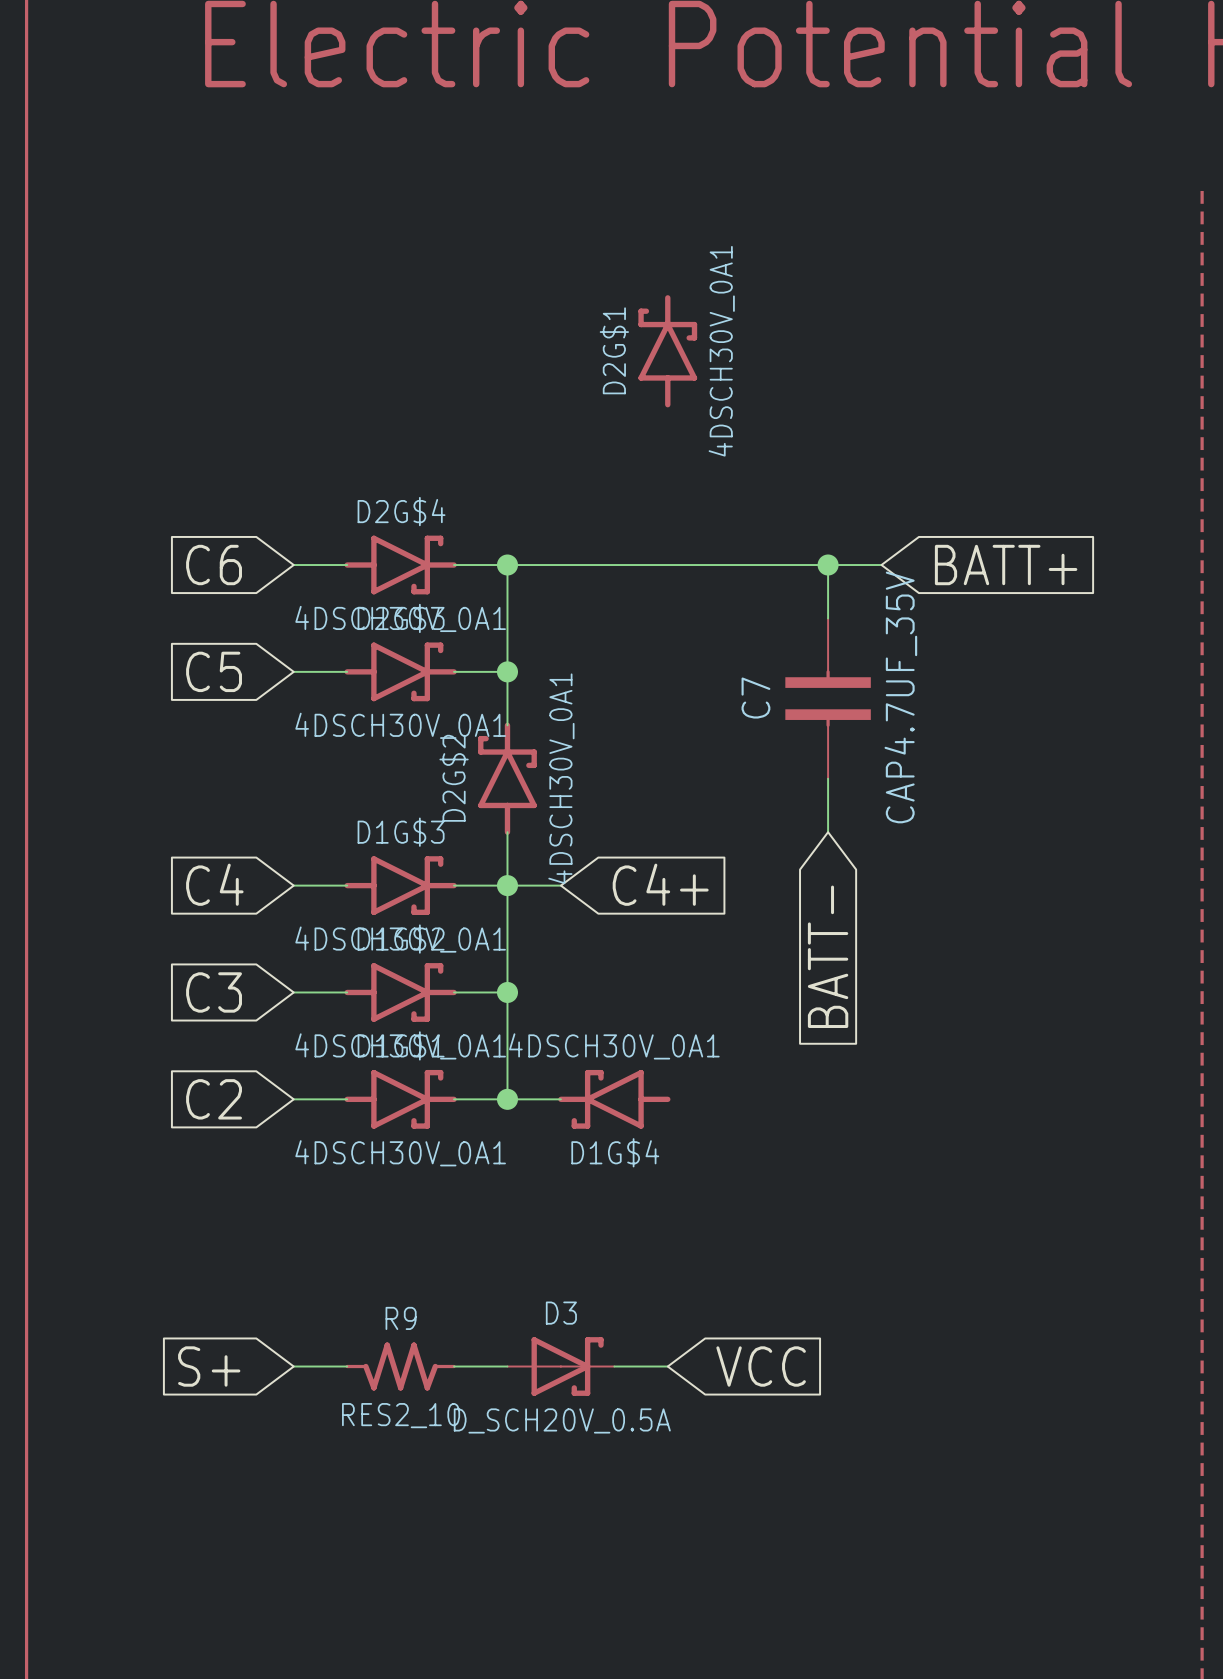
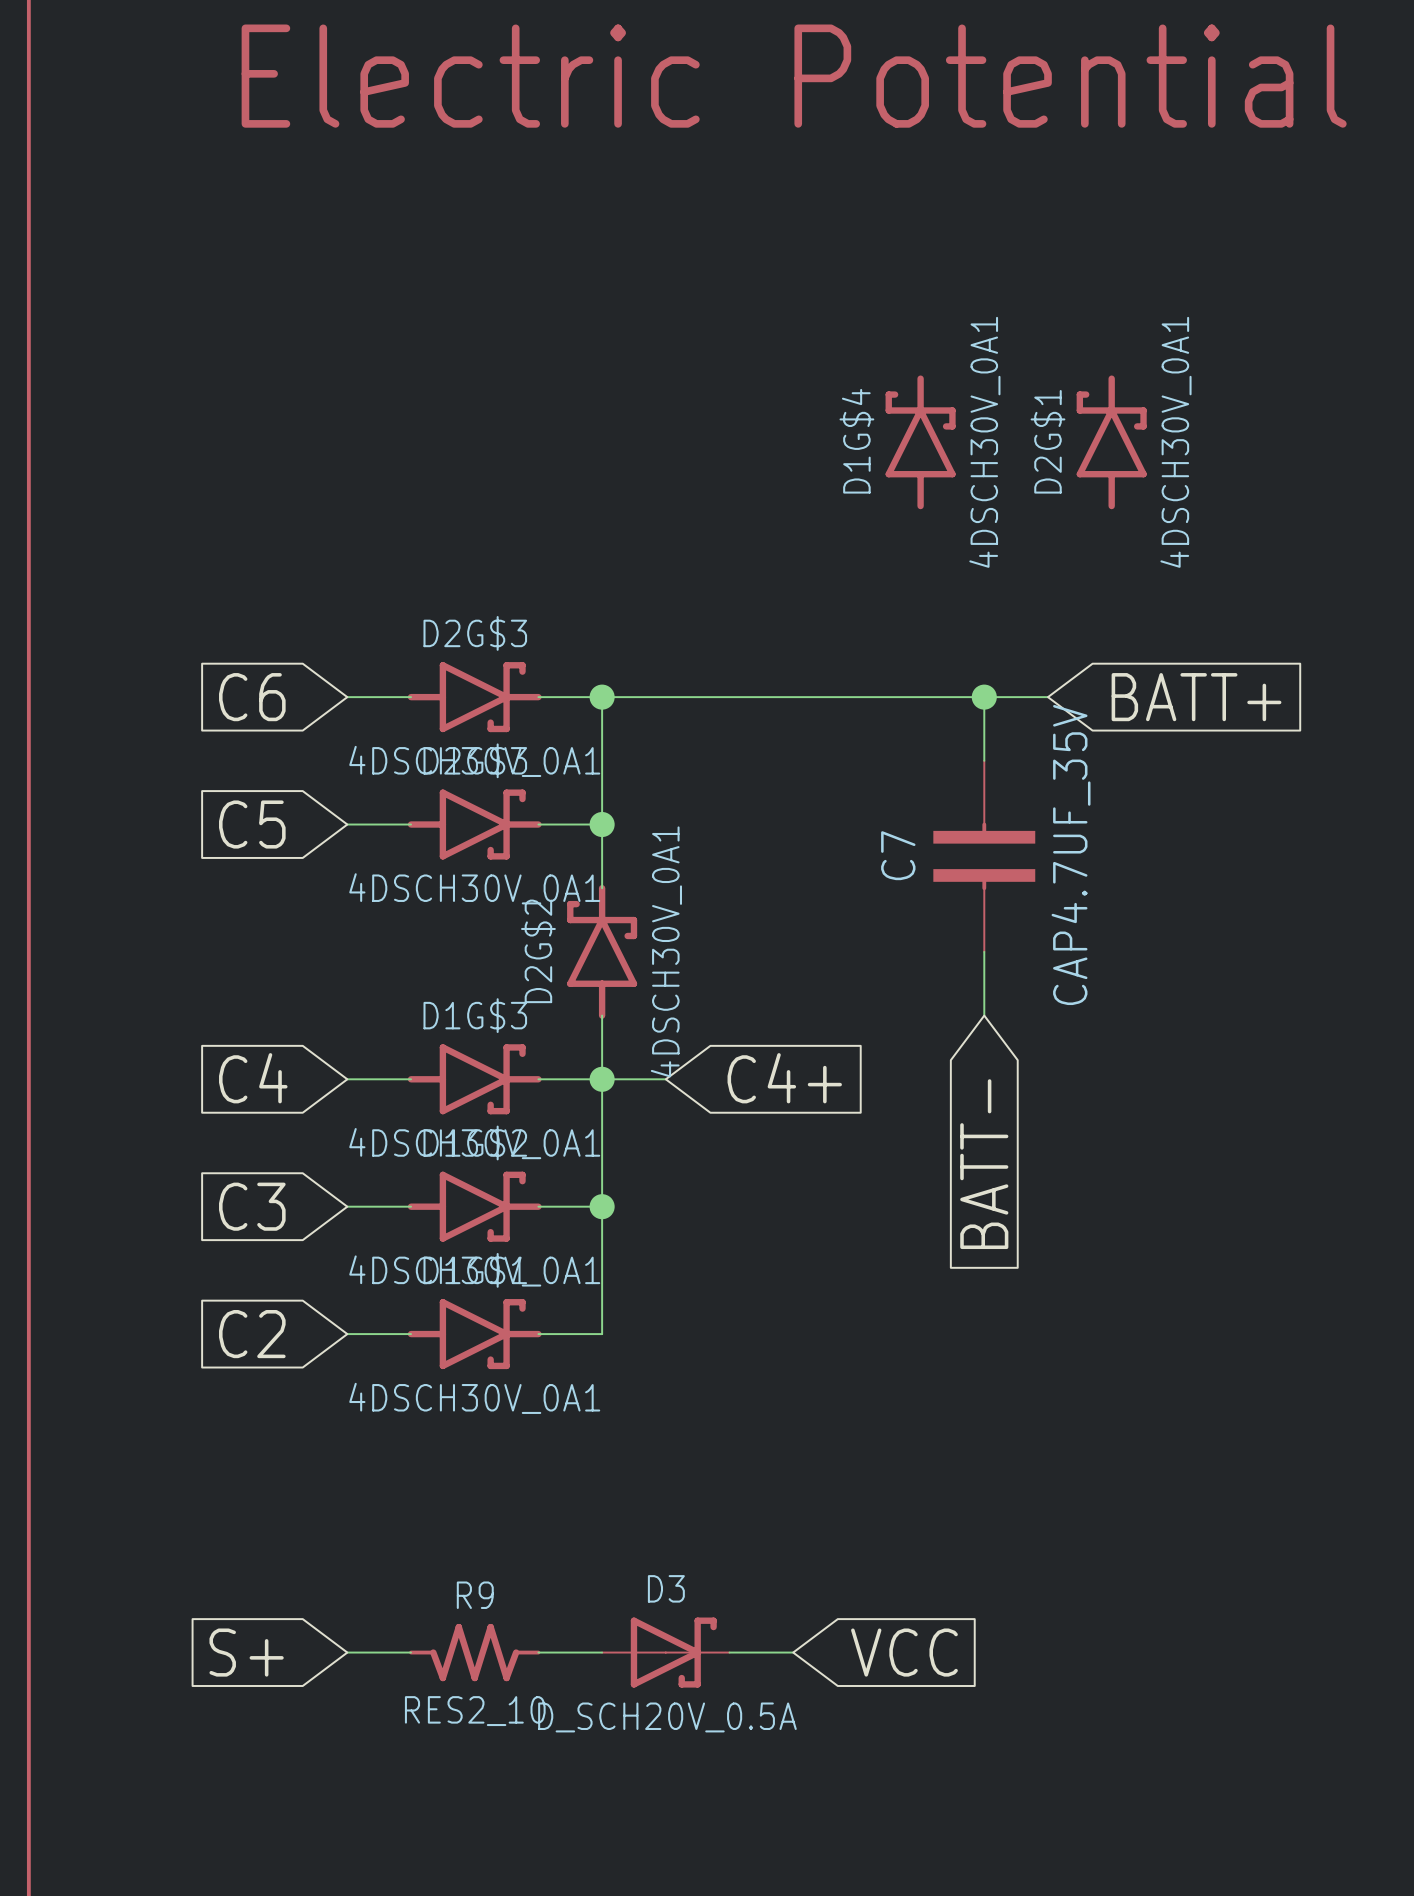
D2G$1 position: (667, 351) -> (1111, 442)
D2G$4 name: D2G$4 (401, 511) -> D2G$3 (475, 633)
wire: (507, 1099) (560, 1099) -> none
junction: (507, 1099) -> none
D1G$4 rotation: 0° (614, 1099) -> 90° clockwise (920, 442)
D1G$4 position: (614, 1099) -> (920, 442)

